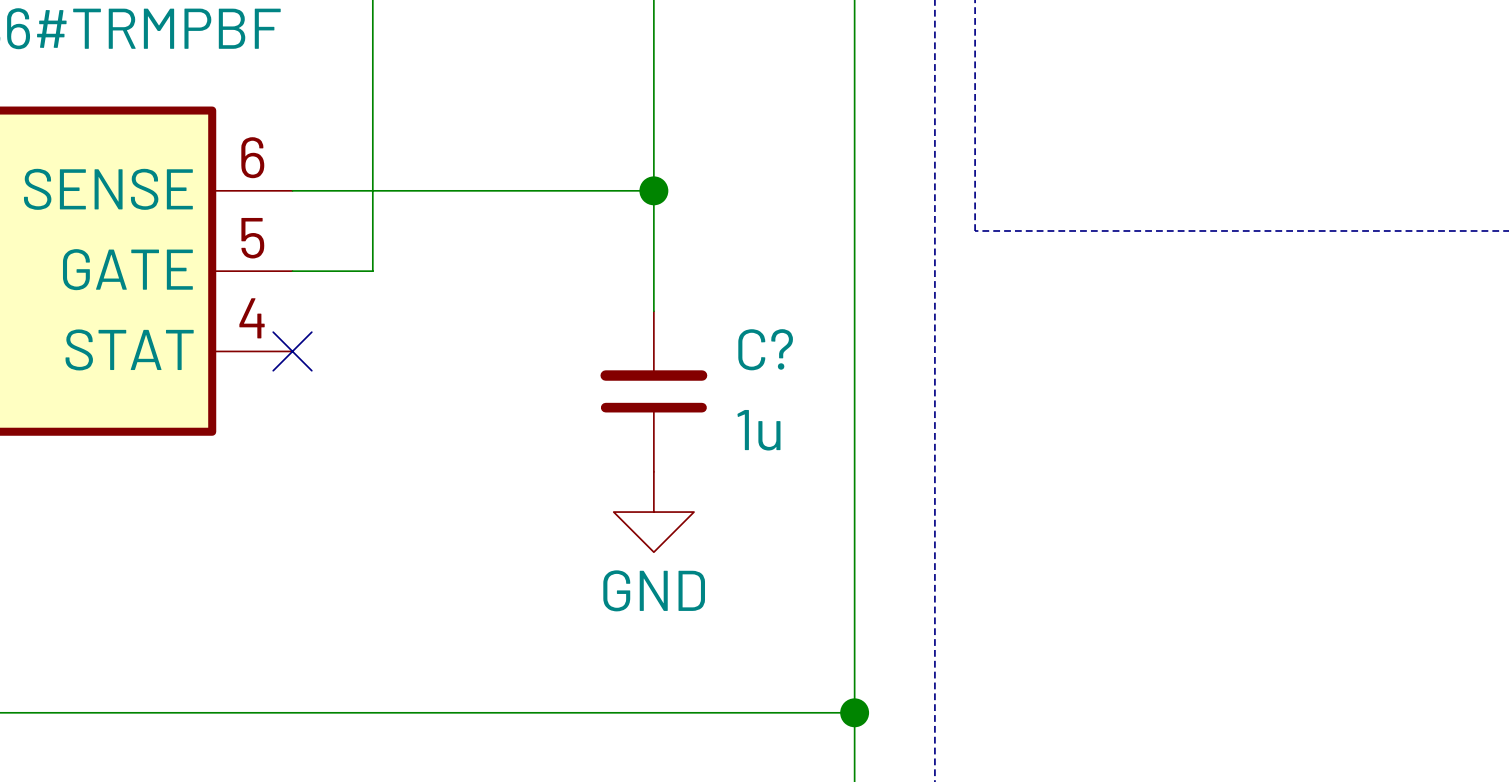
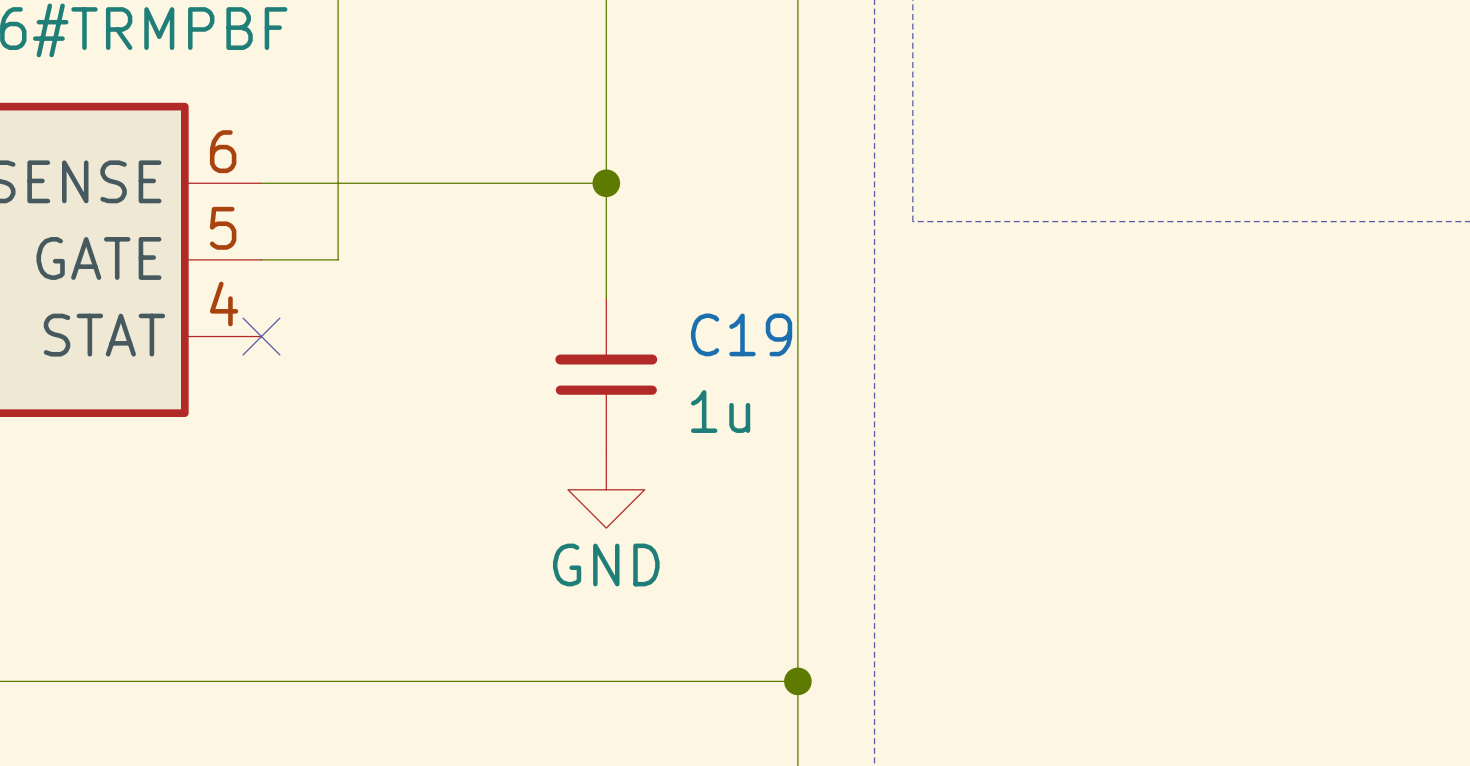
C? name: C? (765, 349) -> C19 (741, 334)

